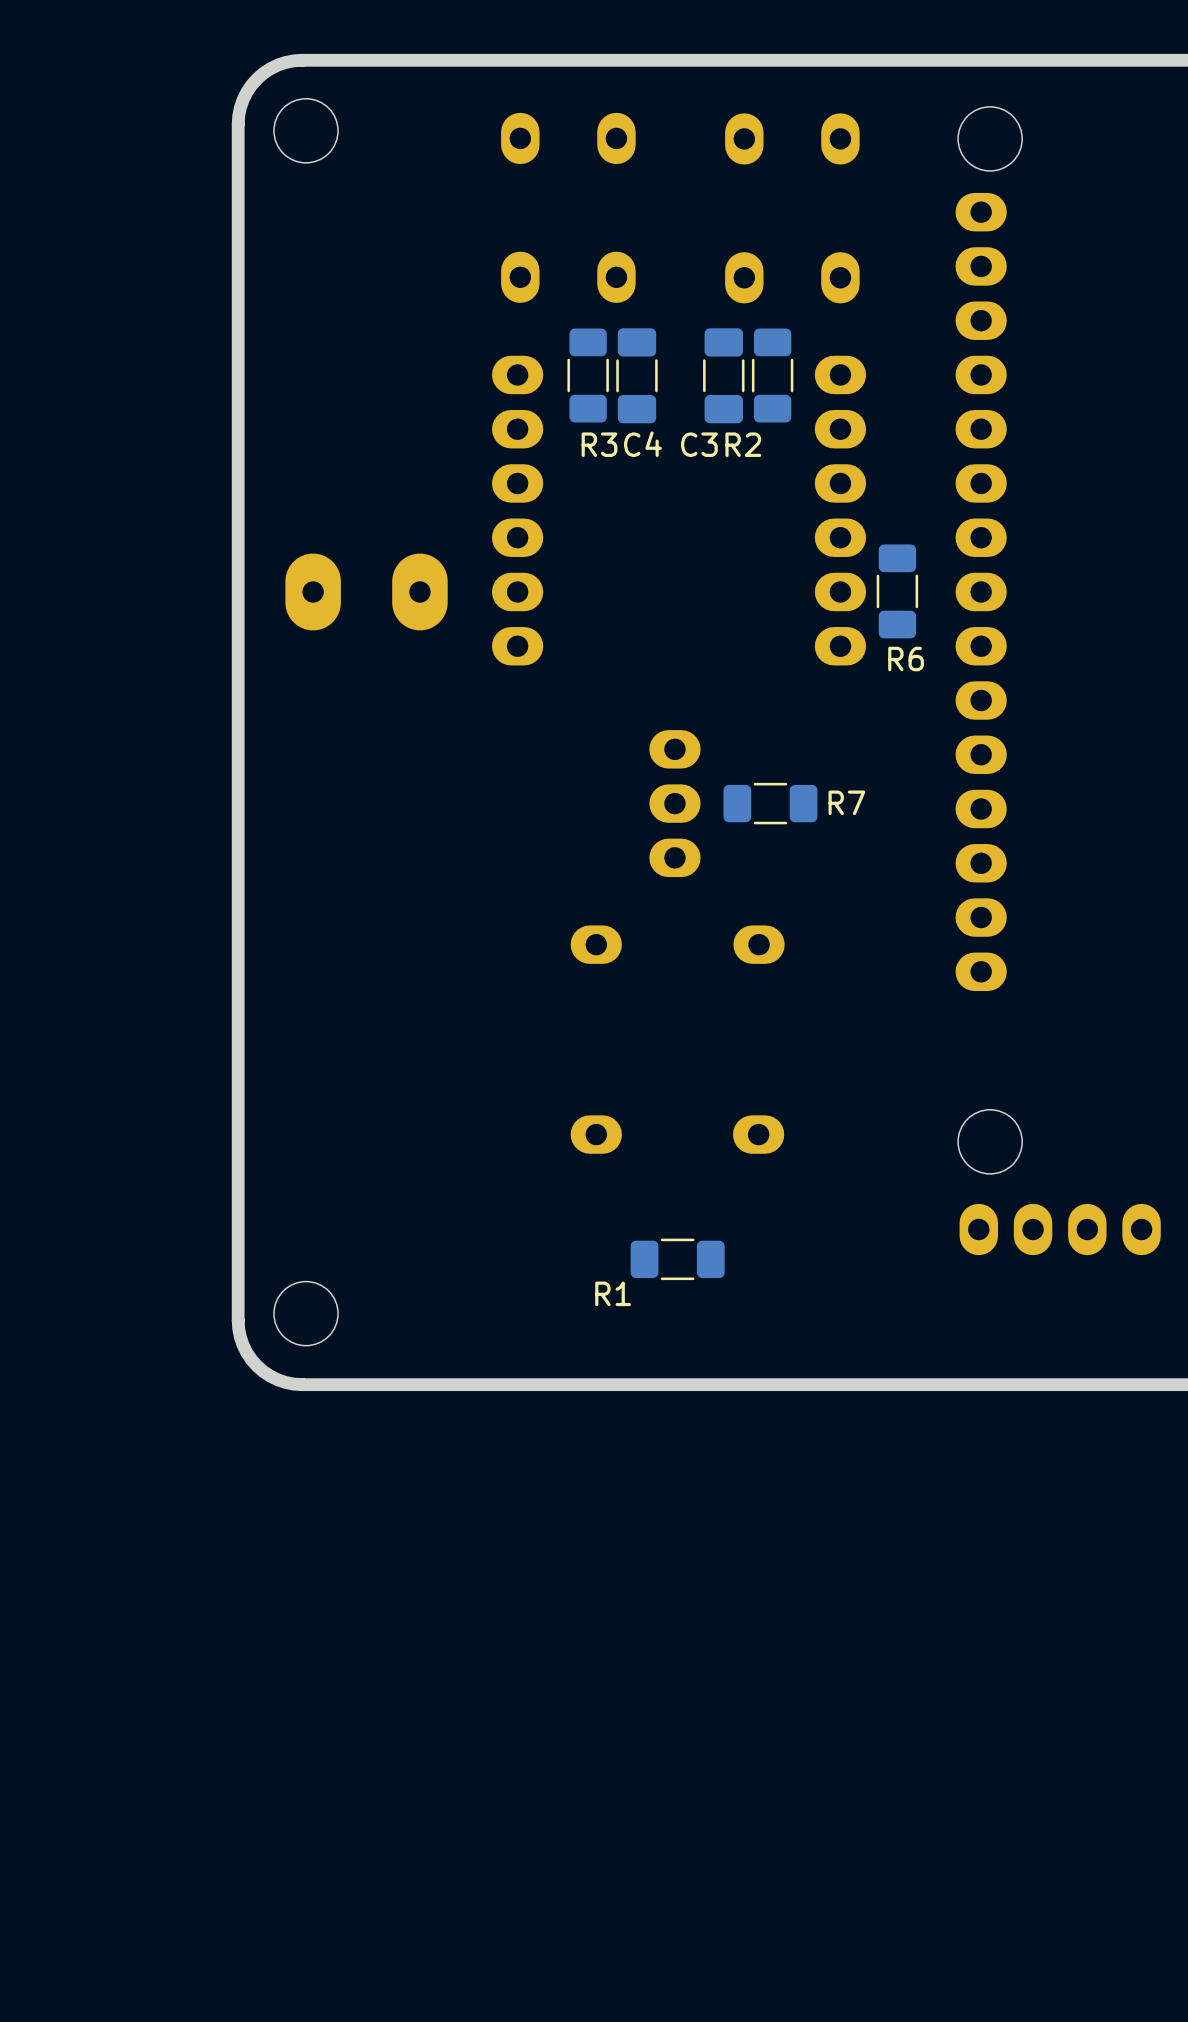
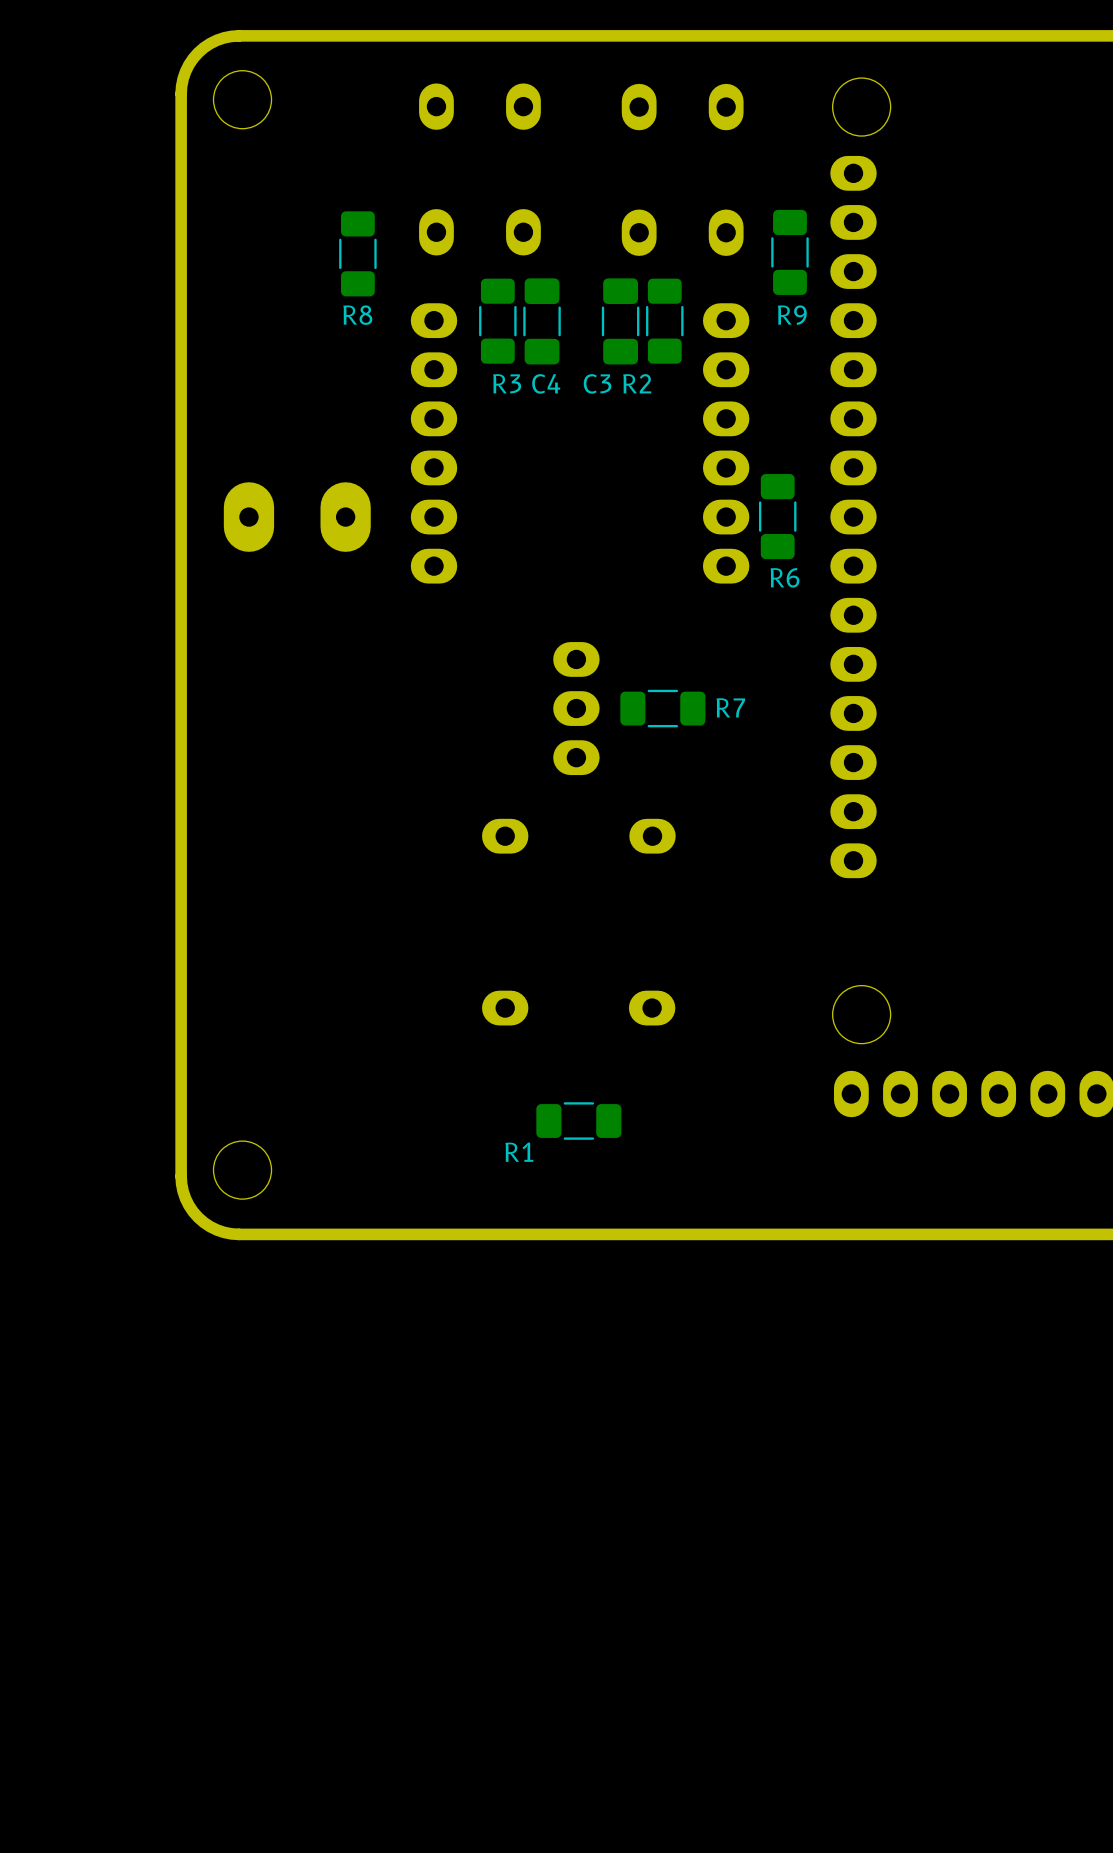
R9: none -> (789, 252)
R8: none -> (357, 253)

